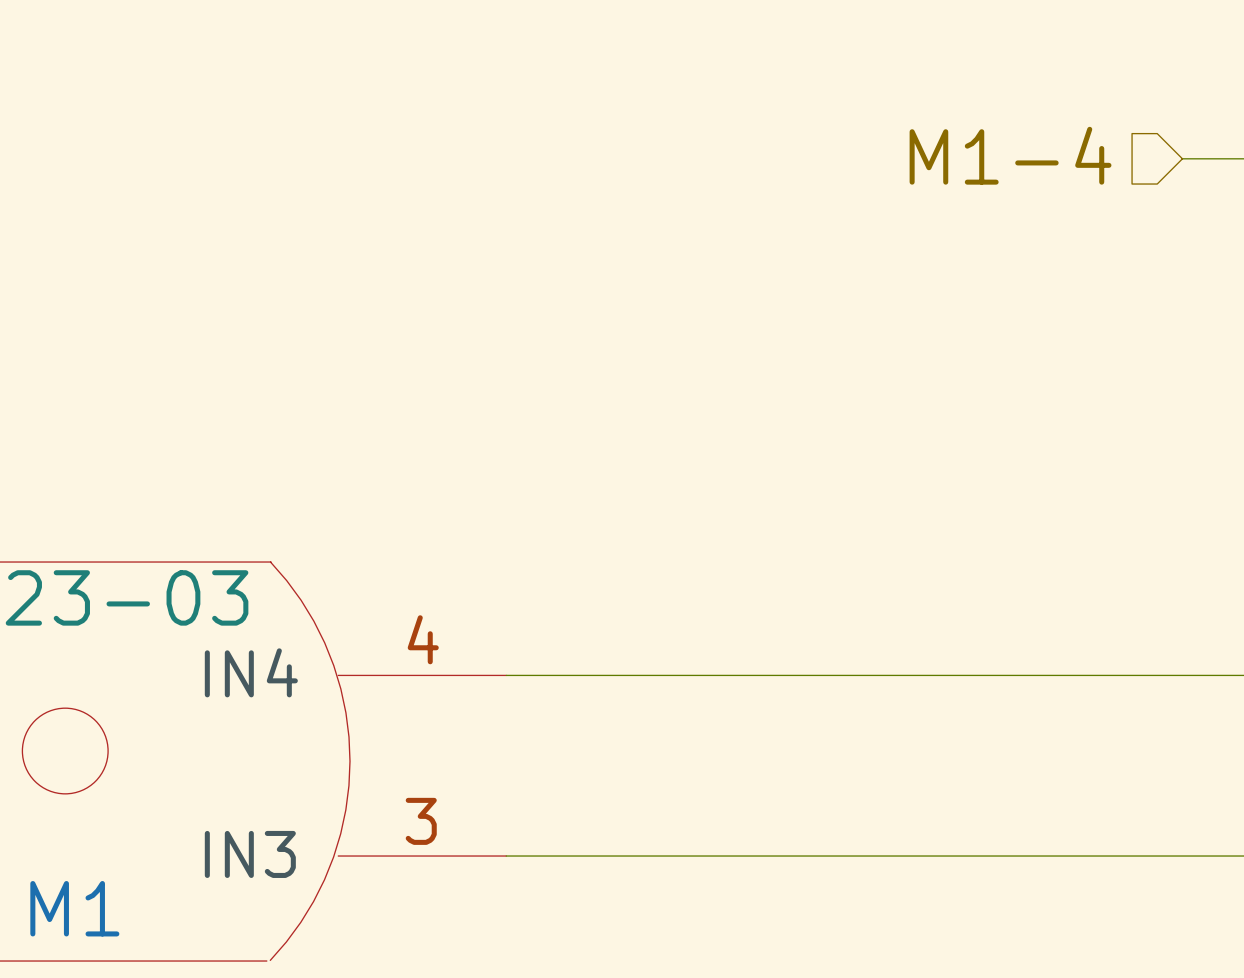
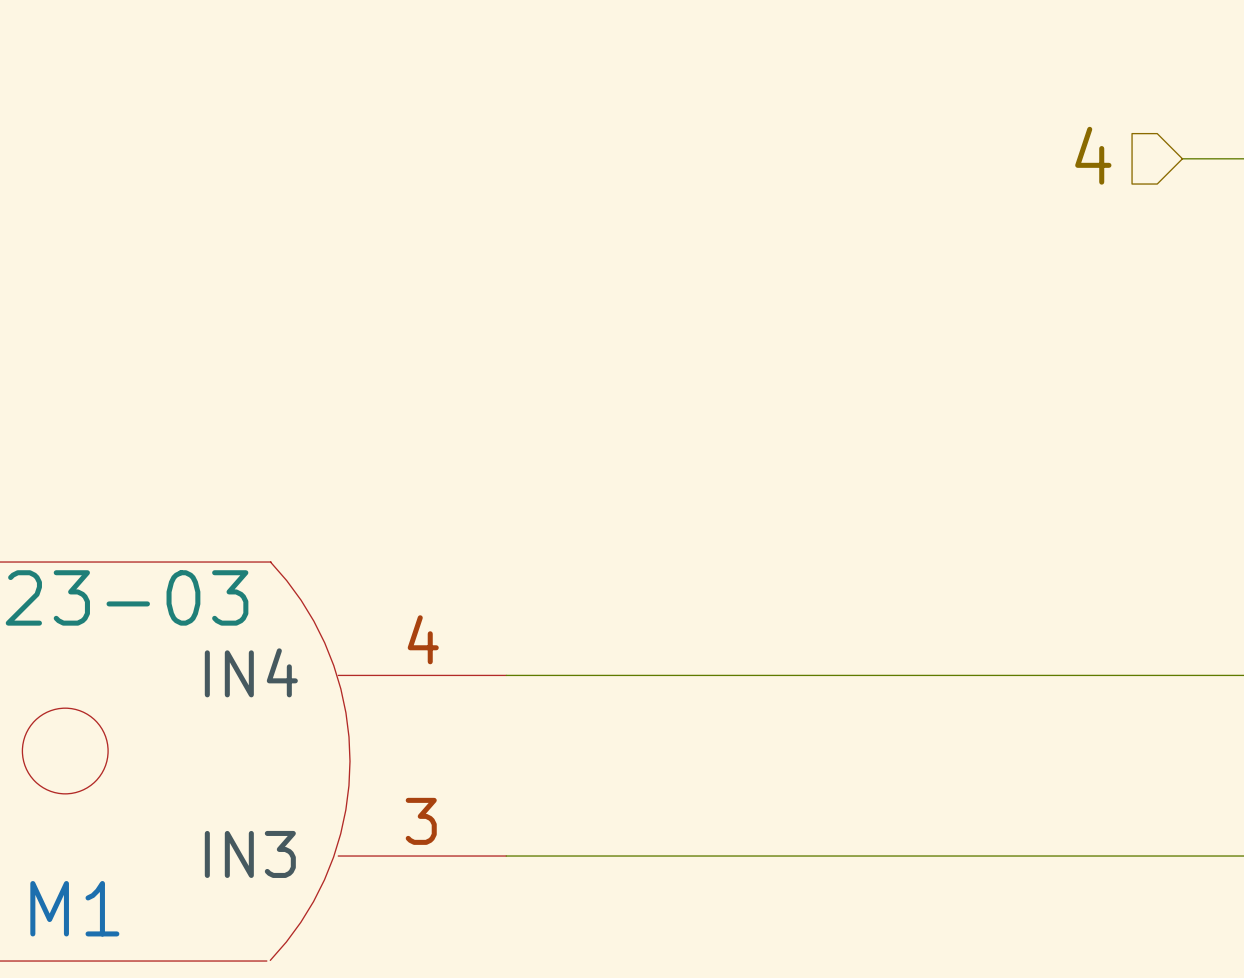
hierarchical label: M1-4 (1010, 155) -> 4 (1093, 155)

